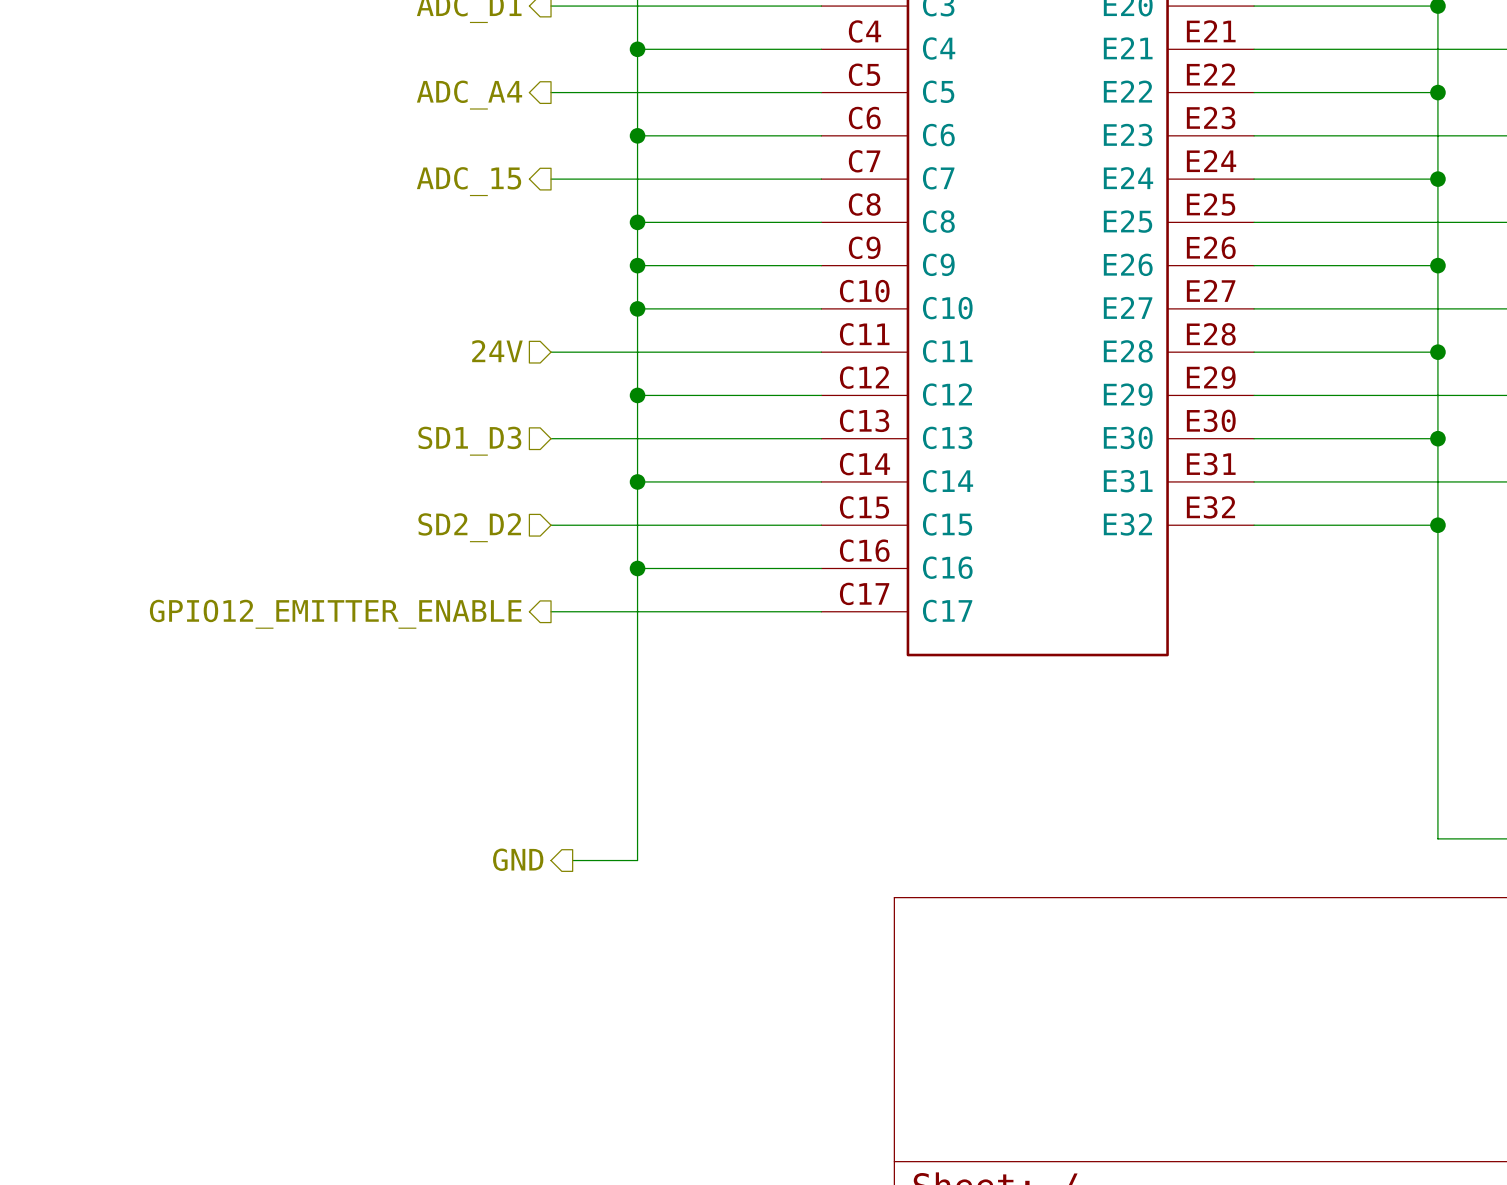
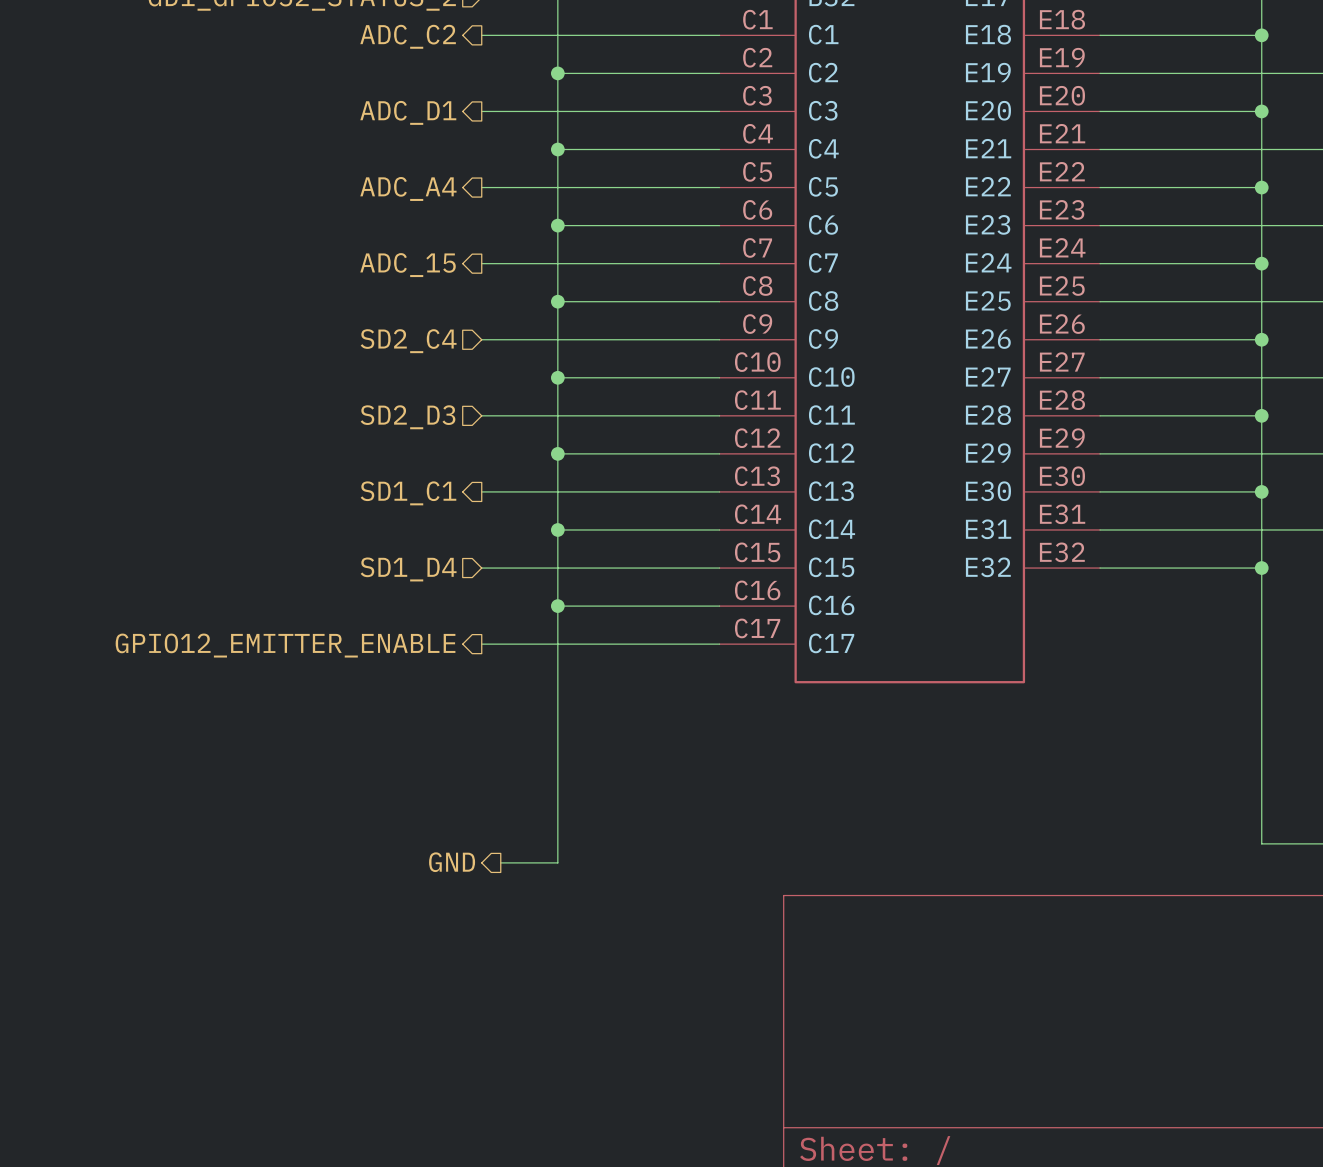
wire: none -> (481, 339) (557, 339)
junction: (637, 265) -> none
hierarchical label: none -> SD2_C4 (408, 341)
hierarchical label: 24V (497, 351) -> SD2_D3 (408, 417)
hierarchical label shape: input (469, 441) -> output (408, 493)
hierarchical label: SD1_D3 (469, 441) -> SD1_C1 (408, 493)
hierarchical label: SD2_D2 (469, 527) -> SD1_D4 (408, 569)

